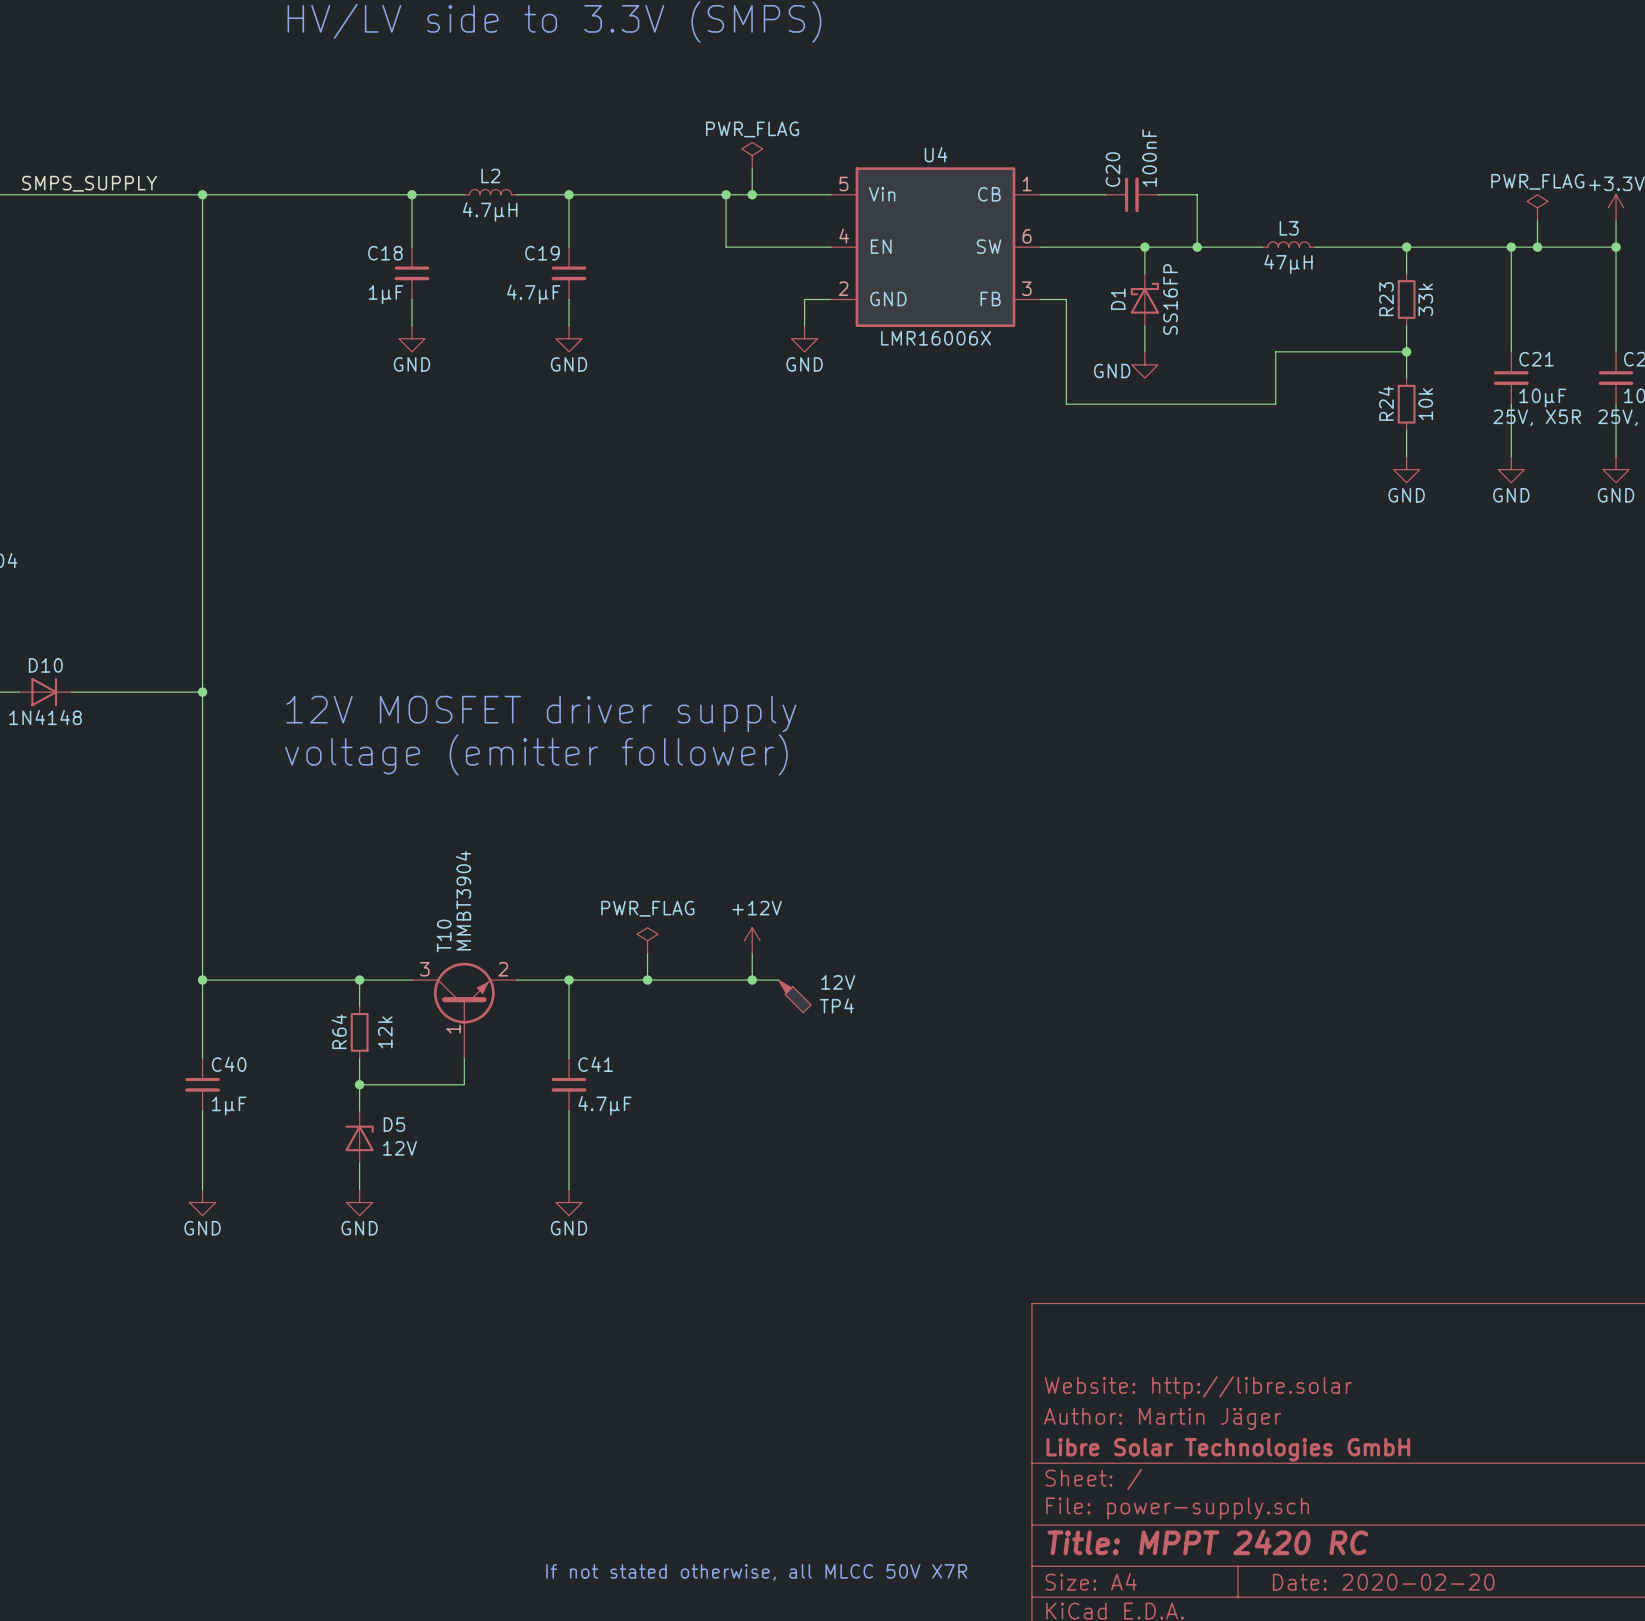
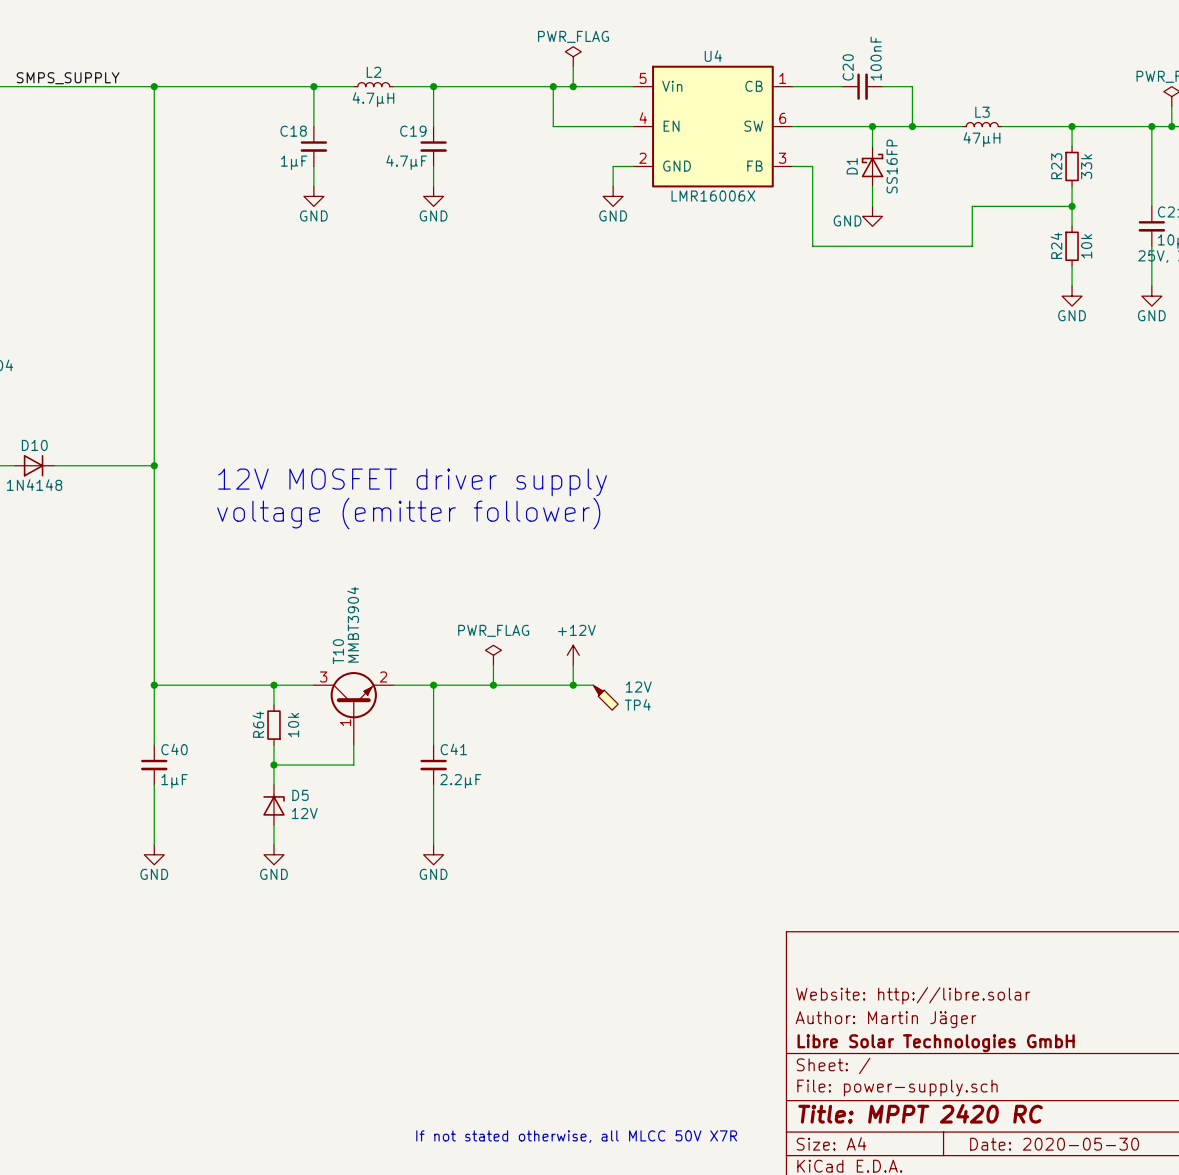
R64 value: 12k (385, 1032) -> 10k (293, 725)
C41 value: 4.7µF (604, 1105) -> 2.2µF (460, 781)
title block: Date: 2020-02-20 (1383, 1582) -> Date: 2020-05-30 (1054, 1144)

